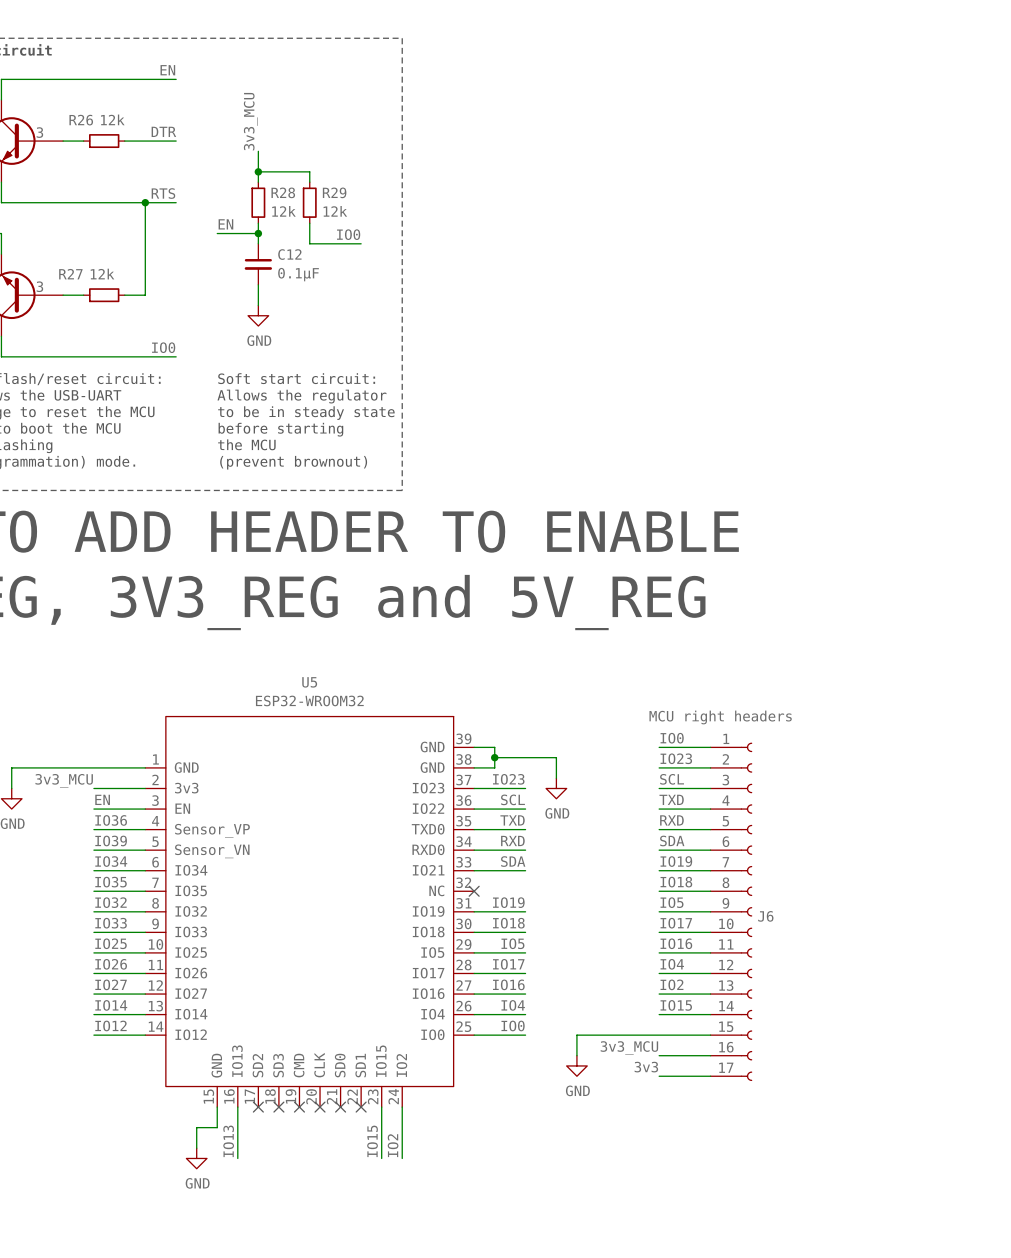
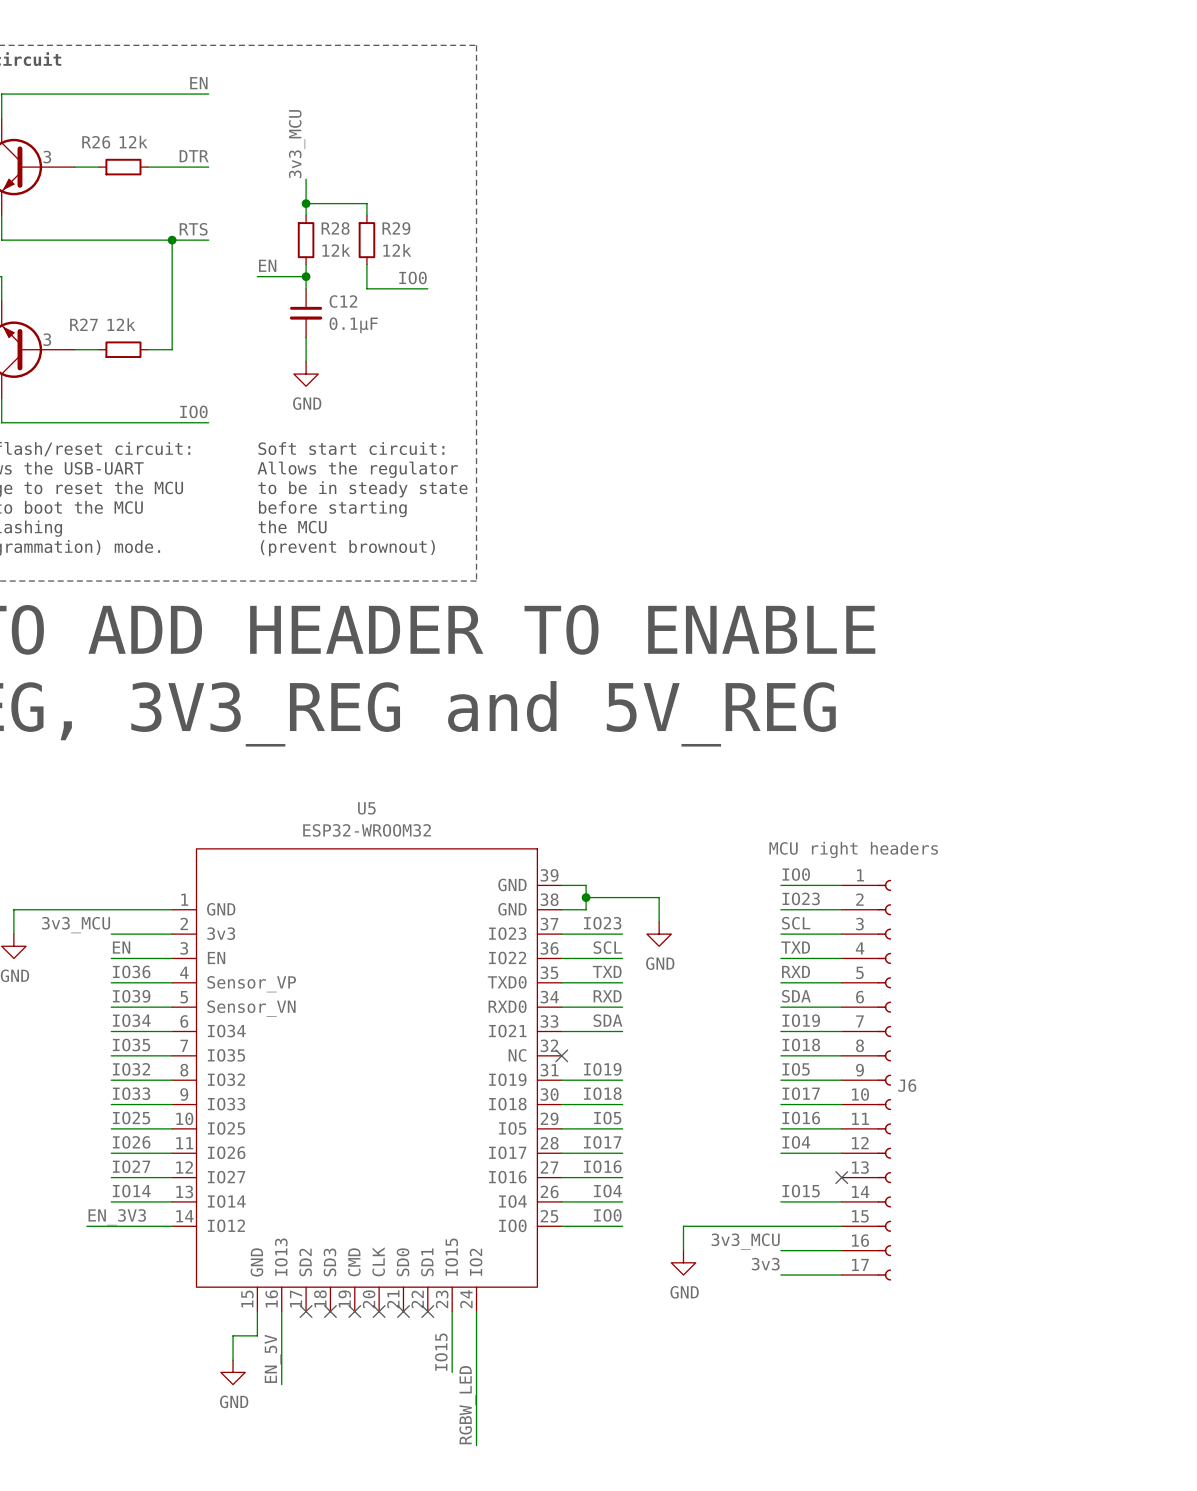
label: IO2 (671, 984) -> none
wire: (659, 994) (710, 994) -> none
no-connect mark: none -> (841, 1177)
label: IO12 (110, 1025) -> none
label: none -> EN_3V3 (117, 1217)
wire: none -> (86, 1226) (111, 1226)
label: IO13 (228, 1141) -> none
label: IO2 (393, 1145) -> none
label: none -> EN_5V (272, 1358)
wire: none -> (281, 1372) (281, 1384)
wire: none -> (476, 1372) (476, 1445)
label: none -> RGBW_LED (467, 1405)

